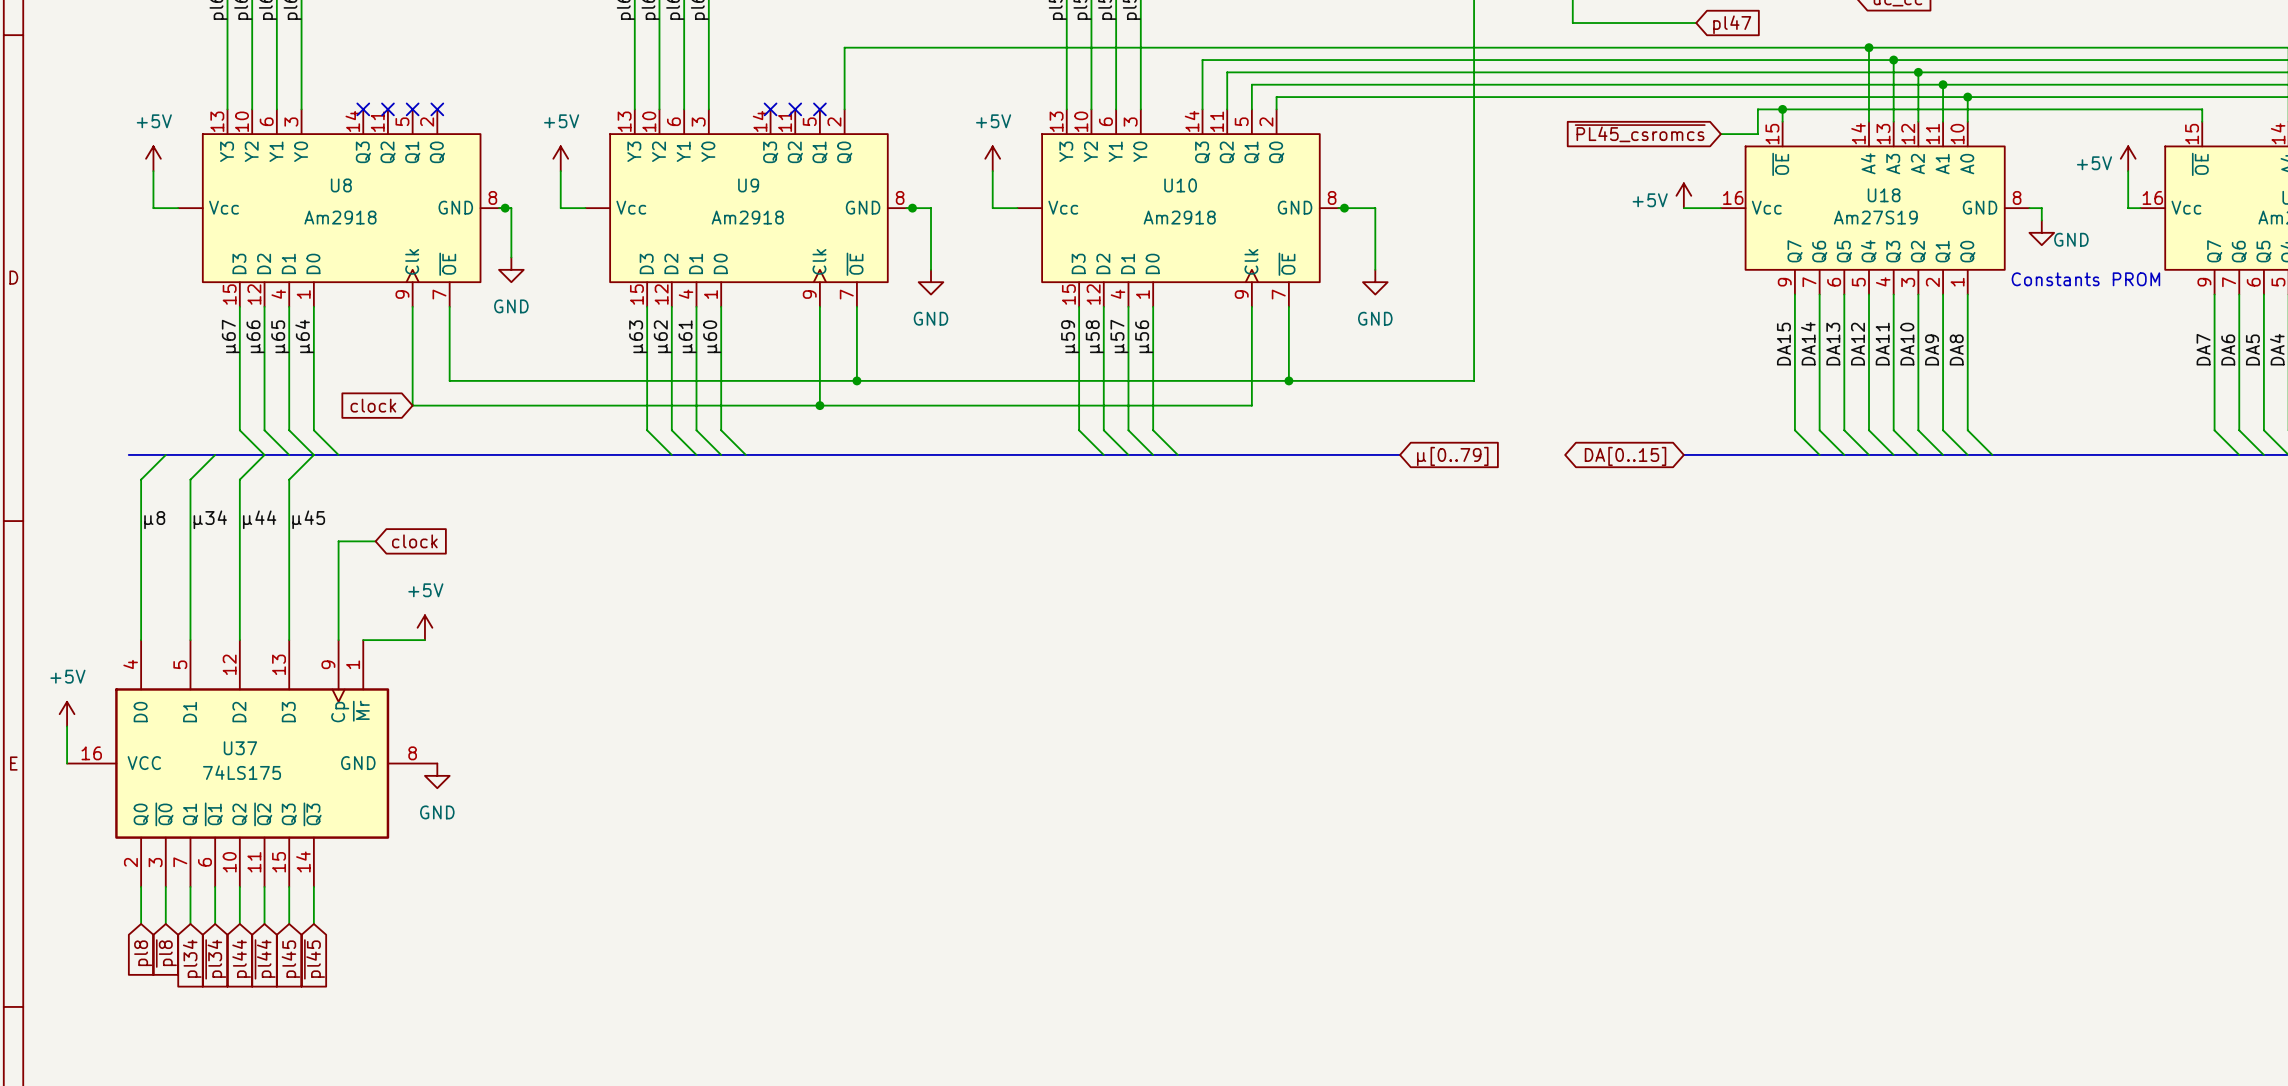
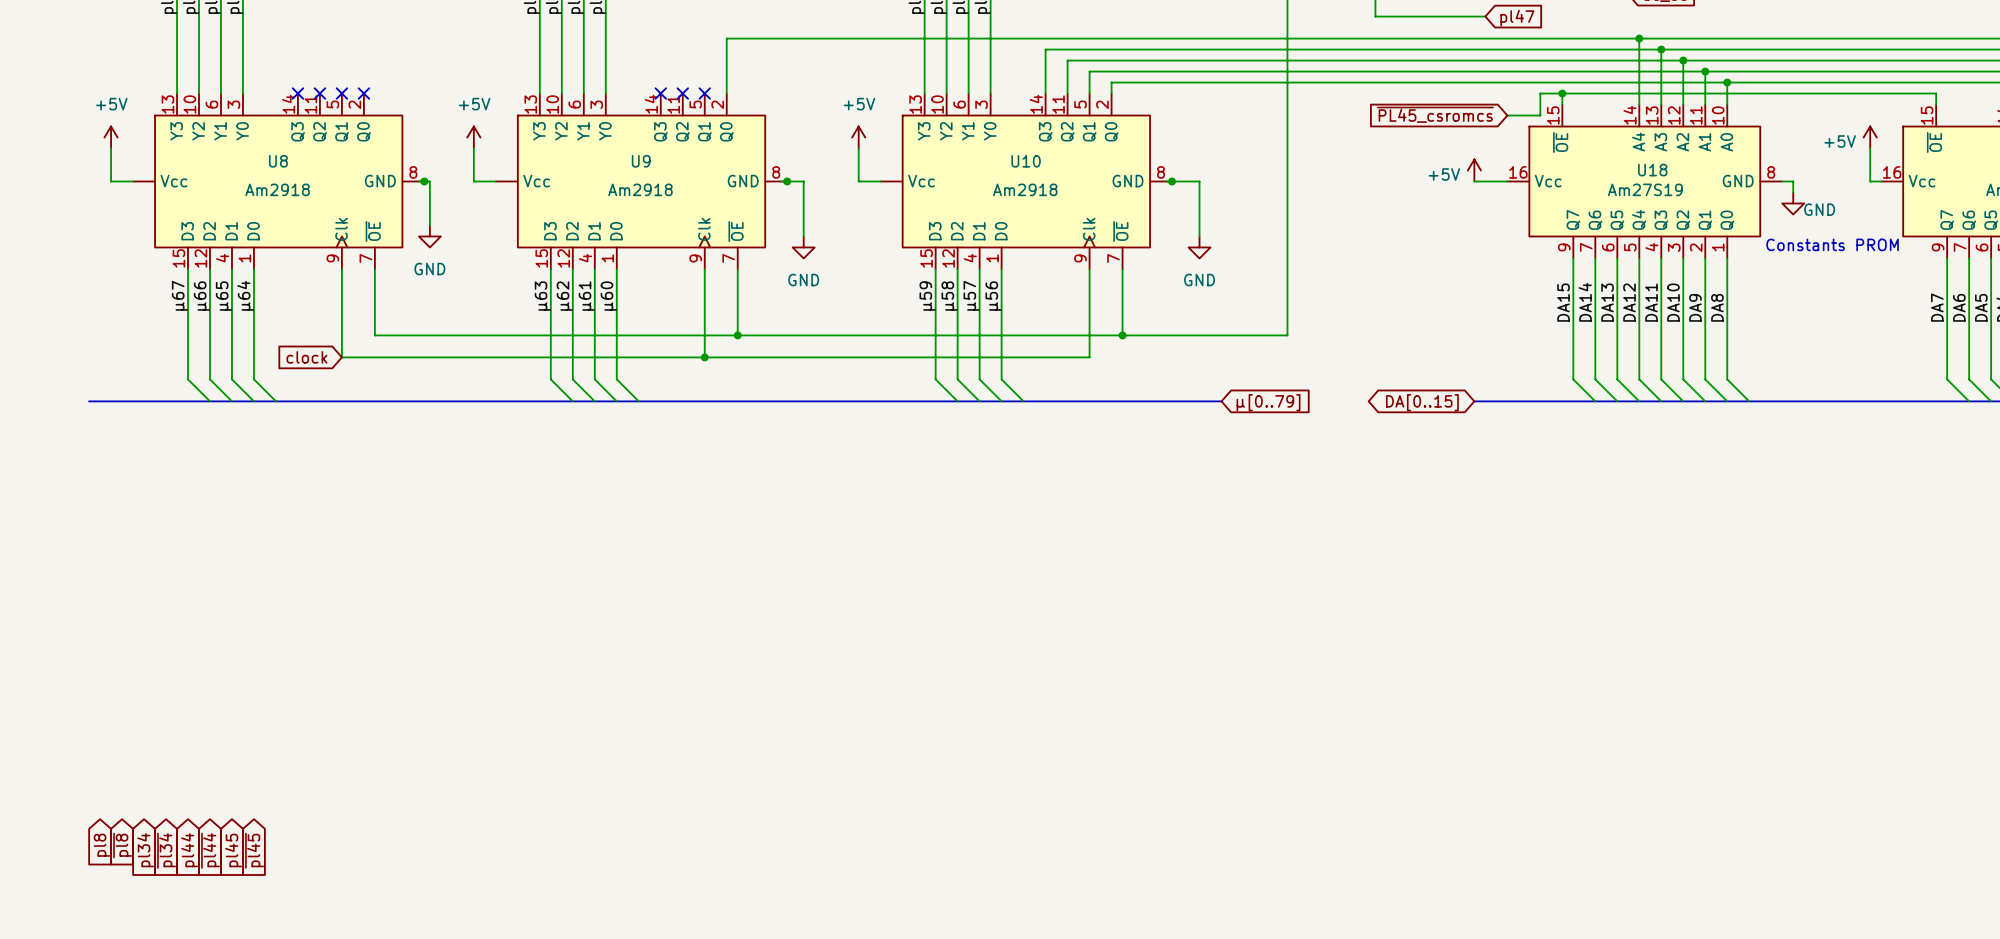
wire: (165, 454) (141, 479) (141, 640) -> none
wire: (215, 454) (190, 479) (190, 640) -> none
wire: (264, 454) (239, 479) (239, 640) -> none
wire: (313, 454) (289, 479) (289, 640) -> none
label: µ34 (210, 519) -> none
label: µ44 (259, 519) -> none
label: µ45 (308, 519) -> none
label: µ8 (154, 520) -> none
wire: (375, 541) (338, 541) (338, 640) -> none
global label: clock (414, 541) -> none
power symbol: +5V (424, 627) -> none
wire: (363, 640) (424, 640) -> none
power symbol: +5V (67, 714) -> none
wire: (67, 726) (67, 763) -> none
U37: 74LS175 (252, 763) -> none
power symbol: GND (437, 775) -> none
wire: (141, 886) (141, 923) -> none
wire: (165, 886) (165, 923) -> none
wire: (190, 886) (190, 923) -> none
wire: (215, 886) (215, 923) -> none
wire: (239, 886) (239, 923) -> none
wire: (264, 886) (264, 923) -> none
wire: (289, 886) (289, 923) -> none
wire: (313, 886) (313, 923) -> none

